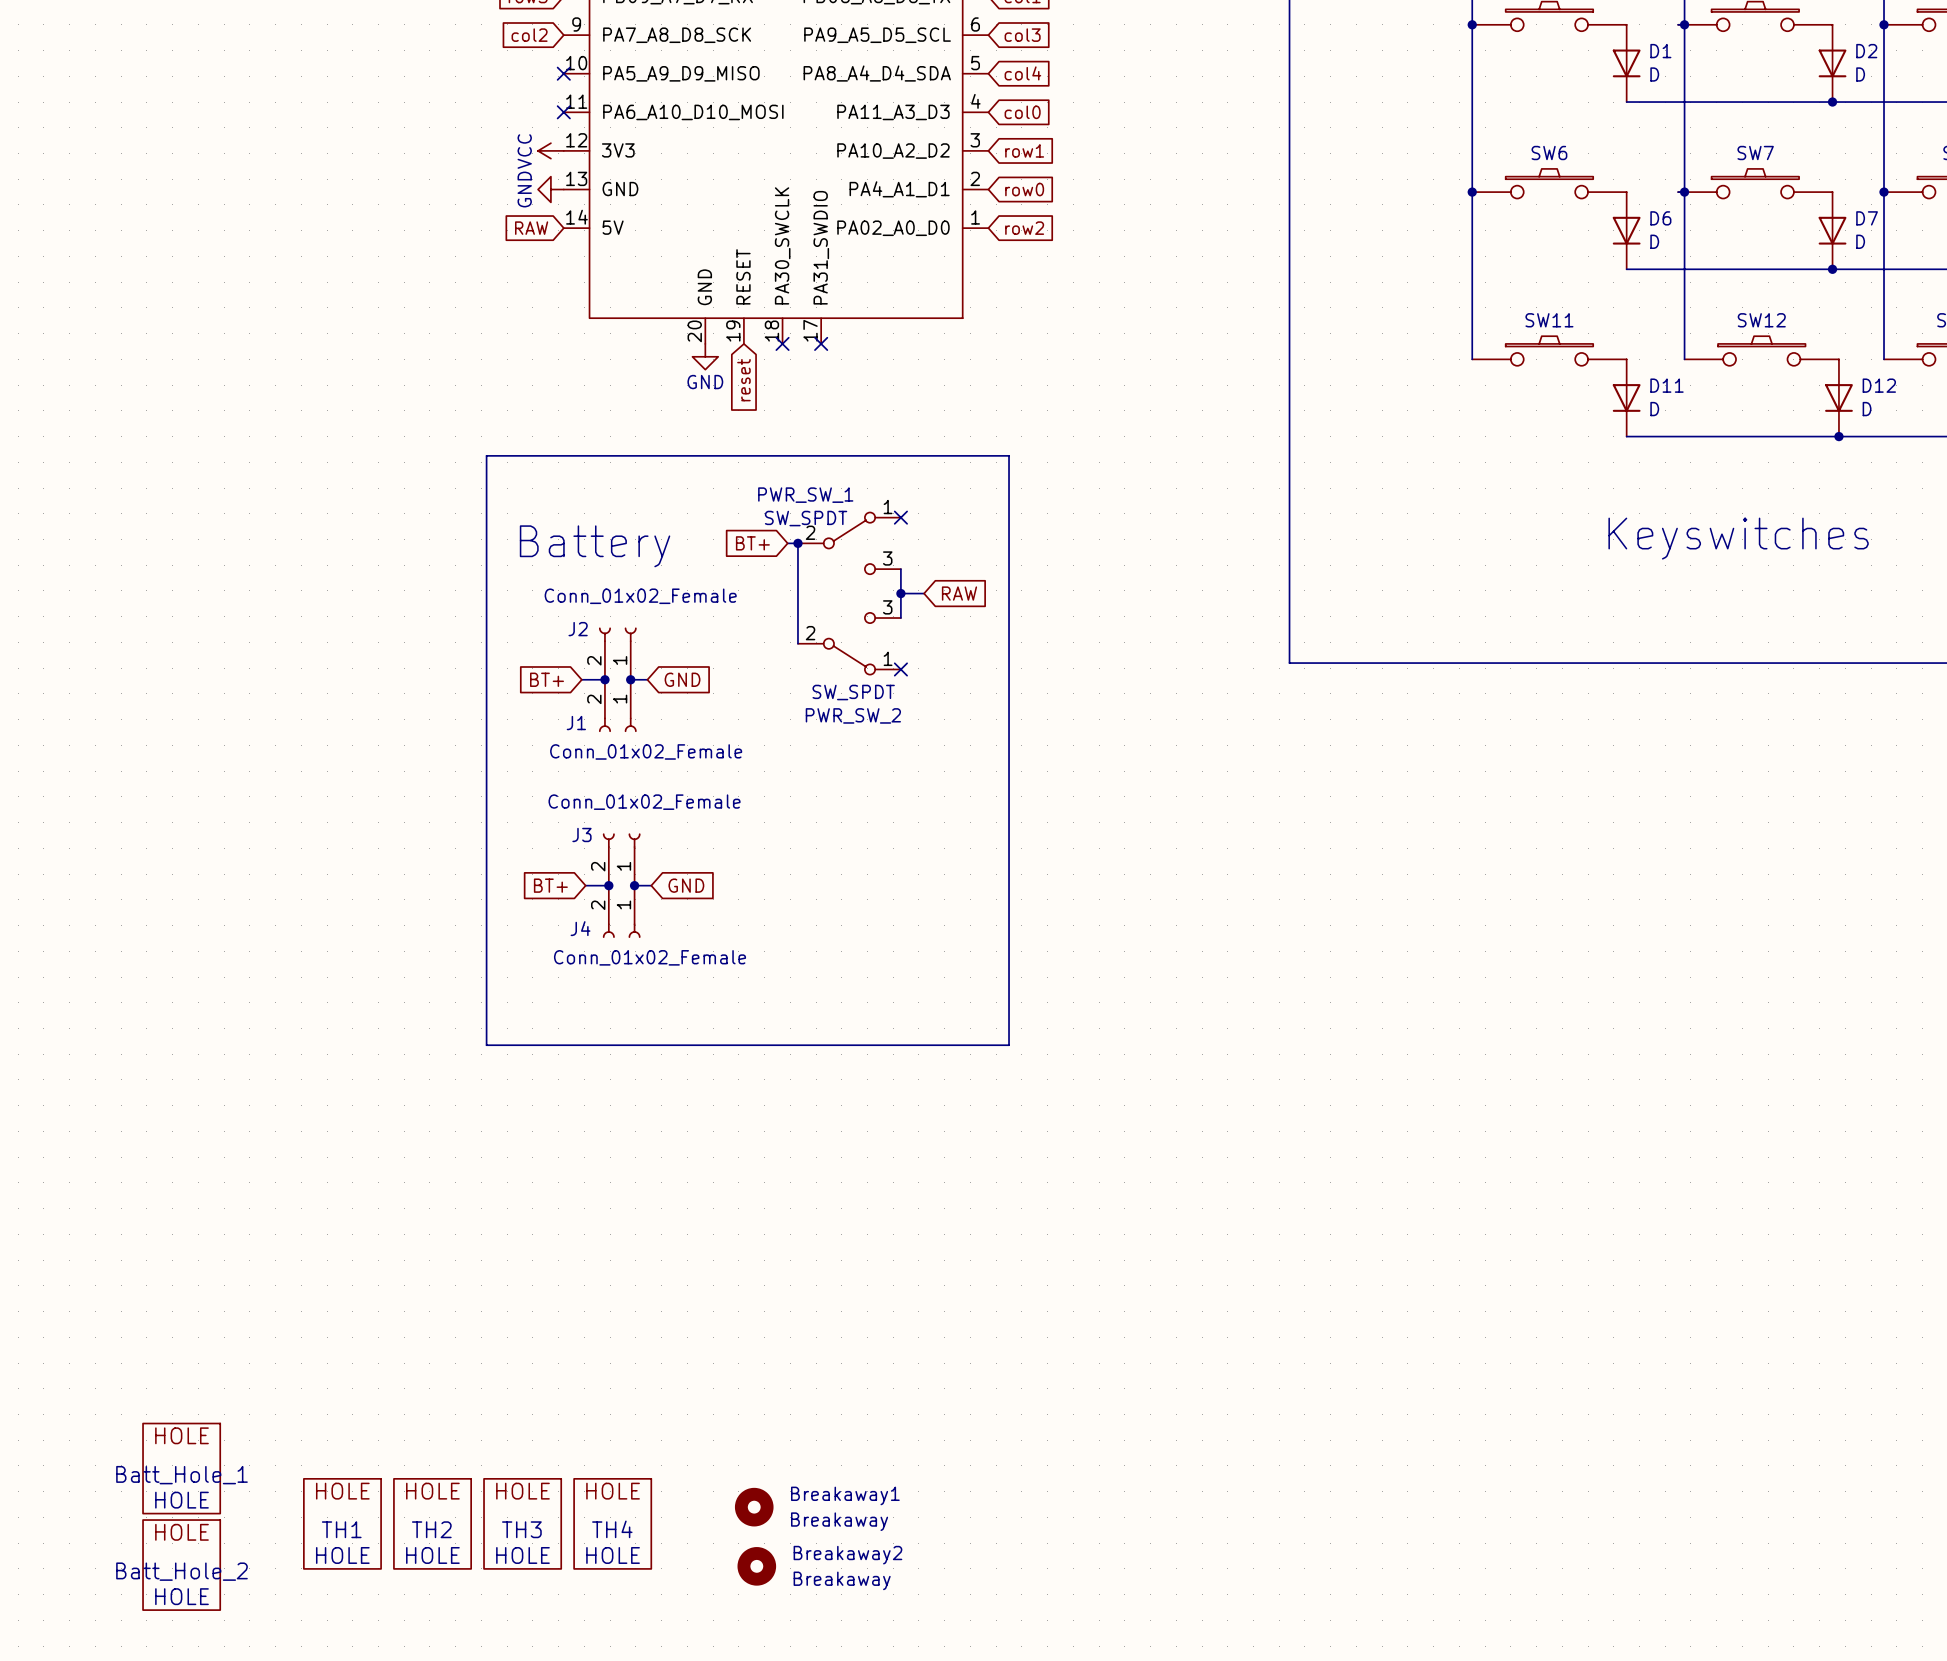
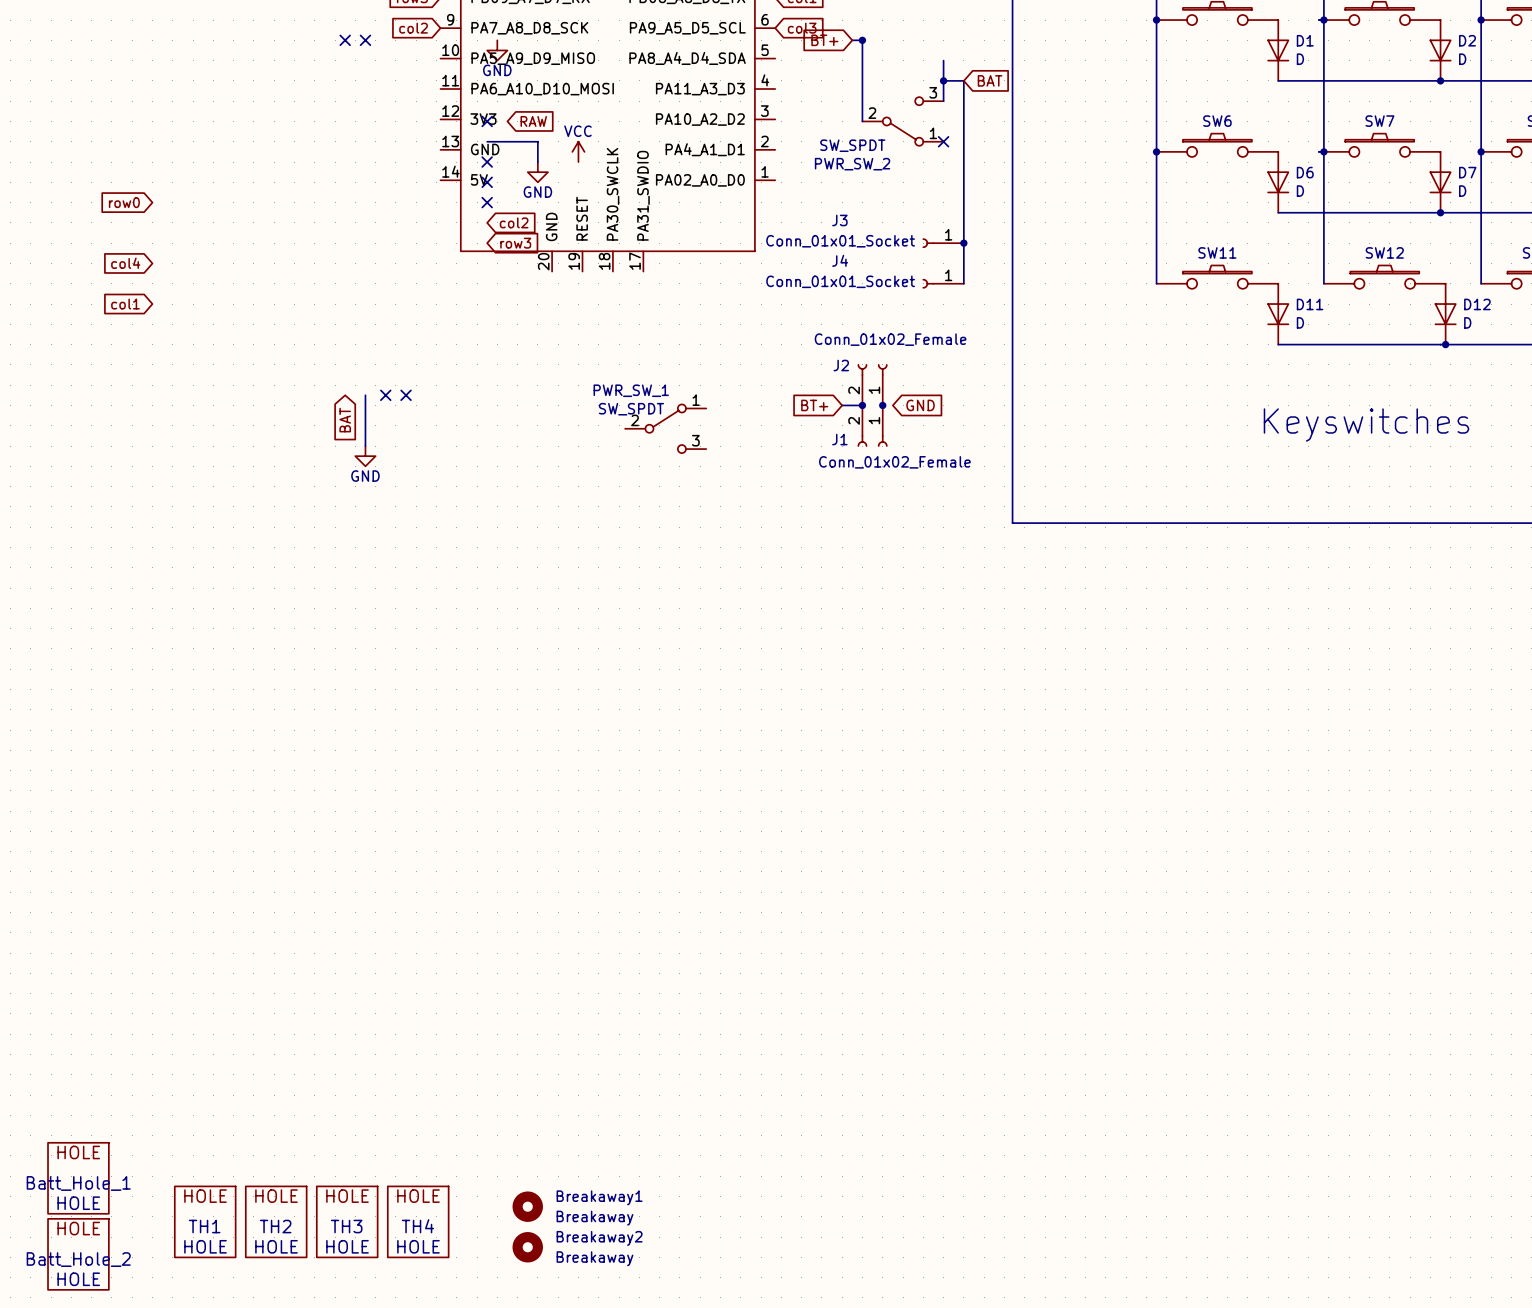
no-connect mark: none -> (345, 40)
no-connect mark: none -> (365, 40)
global label: none -> BT+ (824, 40)
wire: none -> (852, 40) (862, 40) (862, 121)
junction: none -> (862, 40)
power symbol: none -> GND (497, 50)
no-connect mark: (563, 73) -> none
global label: col4 (1022, 73) -> none
wire: none -> (943, 60) (943, 101)
wire: none -> (943, 80) (963, 80) (963, 283)
junction: none -> (943, 80)
global label: none -> BAT (990, 80)
no-connect mark: (563, 112) -> none
global label: col0 (1022, 112) -> none
power symbol rotation: 0° (550, 150) -> 90° clockwise (578, 151)
power symbol position: VCC (550, 150) -> VCC (578, 151)
global label: row1 (1024, 150) -> none
no-connect mark: none -> (487, 121)
wire: none -> (487, 141) (537, 141) (537, 162)
no-connect mark: none -> (943, 141)
power symbol: GND (550, 189) -> none
global label: row0 (1024, 189) -> none
no-connect mark: none -> (487, 162)
power symbol: none -> GND (537, 172)
global label rotation: 0° (531, 228) -> 180° (533, 121)
global label position: RAW (531, 228) -> RAW (533, 121)
global label: row2 (1024, 228) -> none
no-connect mark: none -> (487, 182)
global label: none -> row0 (124, 202)
no-connect mark: none -> (487, 202)
global label: none -> col2 (514, 222)
global label: none -> row3 (515, 243)
junction: none -> (963, 243)
global label: none -> col4 (125, 263)
no-connect mark: (782, 343) -> none
no-connect mark: (821, 343) -> none
power symbol: GND (705, 356) -> none
global label: reset (743, 380) -> none
global label: none -> col1 (125, 304)
line: (486, 455) (1009, 455) (1009, 1045) (486, 1045) (486, 455) -> none
wire: none -> (365, 395) (365, 446)
no-connect mark: none -> (385, 395)
no-connect mark: none -> (406, 395)
global label: none -> BT+ (814, 405)
wire: none -> (842, 405) (862, 405)
junction: none -> (862, 405)
junction: none -> (882, 405)
global label: none -> GND (920, 405)
no-connect mark: (900, 517) -> none
global label: none -> BAT (345, 420)
global label: BT+ (752, 543) -> none
wire: (787, 543) (797, 543) (797, 643) -> none
junction: (797, 543) -> none
text: Battery (595, 546) -> none
wire: (900, 569) (900, 618) -> none
power symbol: none -> GND (365, 456)
wire: (900, 593) (924, 593) -> none
junction: (900, 593) -> none
global label: RAW (959, 593) -> none
PWR_SW_2 position: (849, 643) -> (903, 121)
J2 position: (617, 653) -> (872, 384)
no-connect mark: (900, 669) -> none
global label: BT+ (547, 679) -> none
wire: (581, 679) (604, 679) -> none
junction: (604, 679) -> none
wire: (630, 679) (647, 679) -> none
junction: (630, 679) -> none
global label: GND (682, 679) -> none
PWR_SW_2 value position: SW_SPDT (853, 692) -> SW_SPDT (852, 145)
J1 position: (617, 705) -> (872, 426)
PWR_SW_2 name position: PWR_SW_2 (853, 715) -> PWR_SW_2 (852, 164)
J3 value: Conn_01x02_Female (644, 802) -> Conn_01x01_Socket (840, 241)
J3 symbol: [602, 833, 641, 886] -> [922, 238, 964, 248]
J3 name position: J3 (581, 834) -> J3 (839, 220)
global label: BT+ (550, 885) -> none
wire: (585, 885) (608, 885) -> none
J4 symbol: [602, 885, 641, 938] -> [922, 279, 964, 289]
junction: (608, 885) -> none
wire: (634, 885) (651, 885) -> none
junction: (634, 885) -> none
global label: GND (686, 885) -> none
J4 name position: J4 (580, 928) -> J4 (840, 260)
J4 value: Conn_01x02_Female (650, 957) -> Conn_01x01_Socket (840, 281)
Batt_Hole_1 position: (181, 1468) -> (78, 1178)
Breakaway1 position: (754, 1507) -> (527, 1206)
TH1 position: (342, 1523) -> (205, 1221)
TH2 position: (432, 1523) -> (276, 1221)
TH3 position: (522, 1523) -> (347, 1221)
TH4 position: (612, 1523) -> (418, 1221)
Batt_Hole_2 position: (181, 1565) -> (78, 1254)
Breakaway2 position: (756, 1566) -> (527, 1247)

